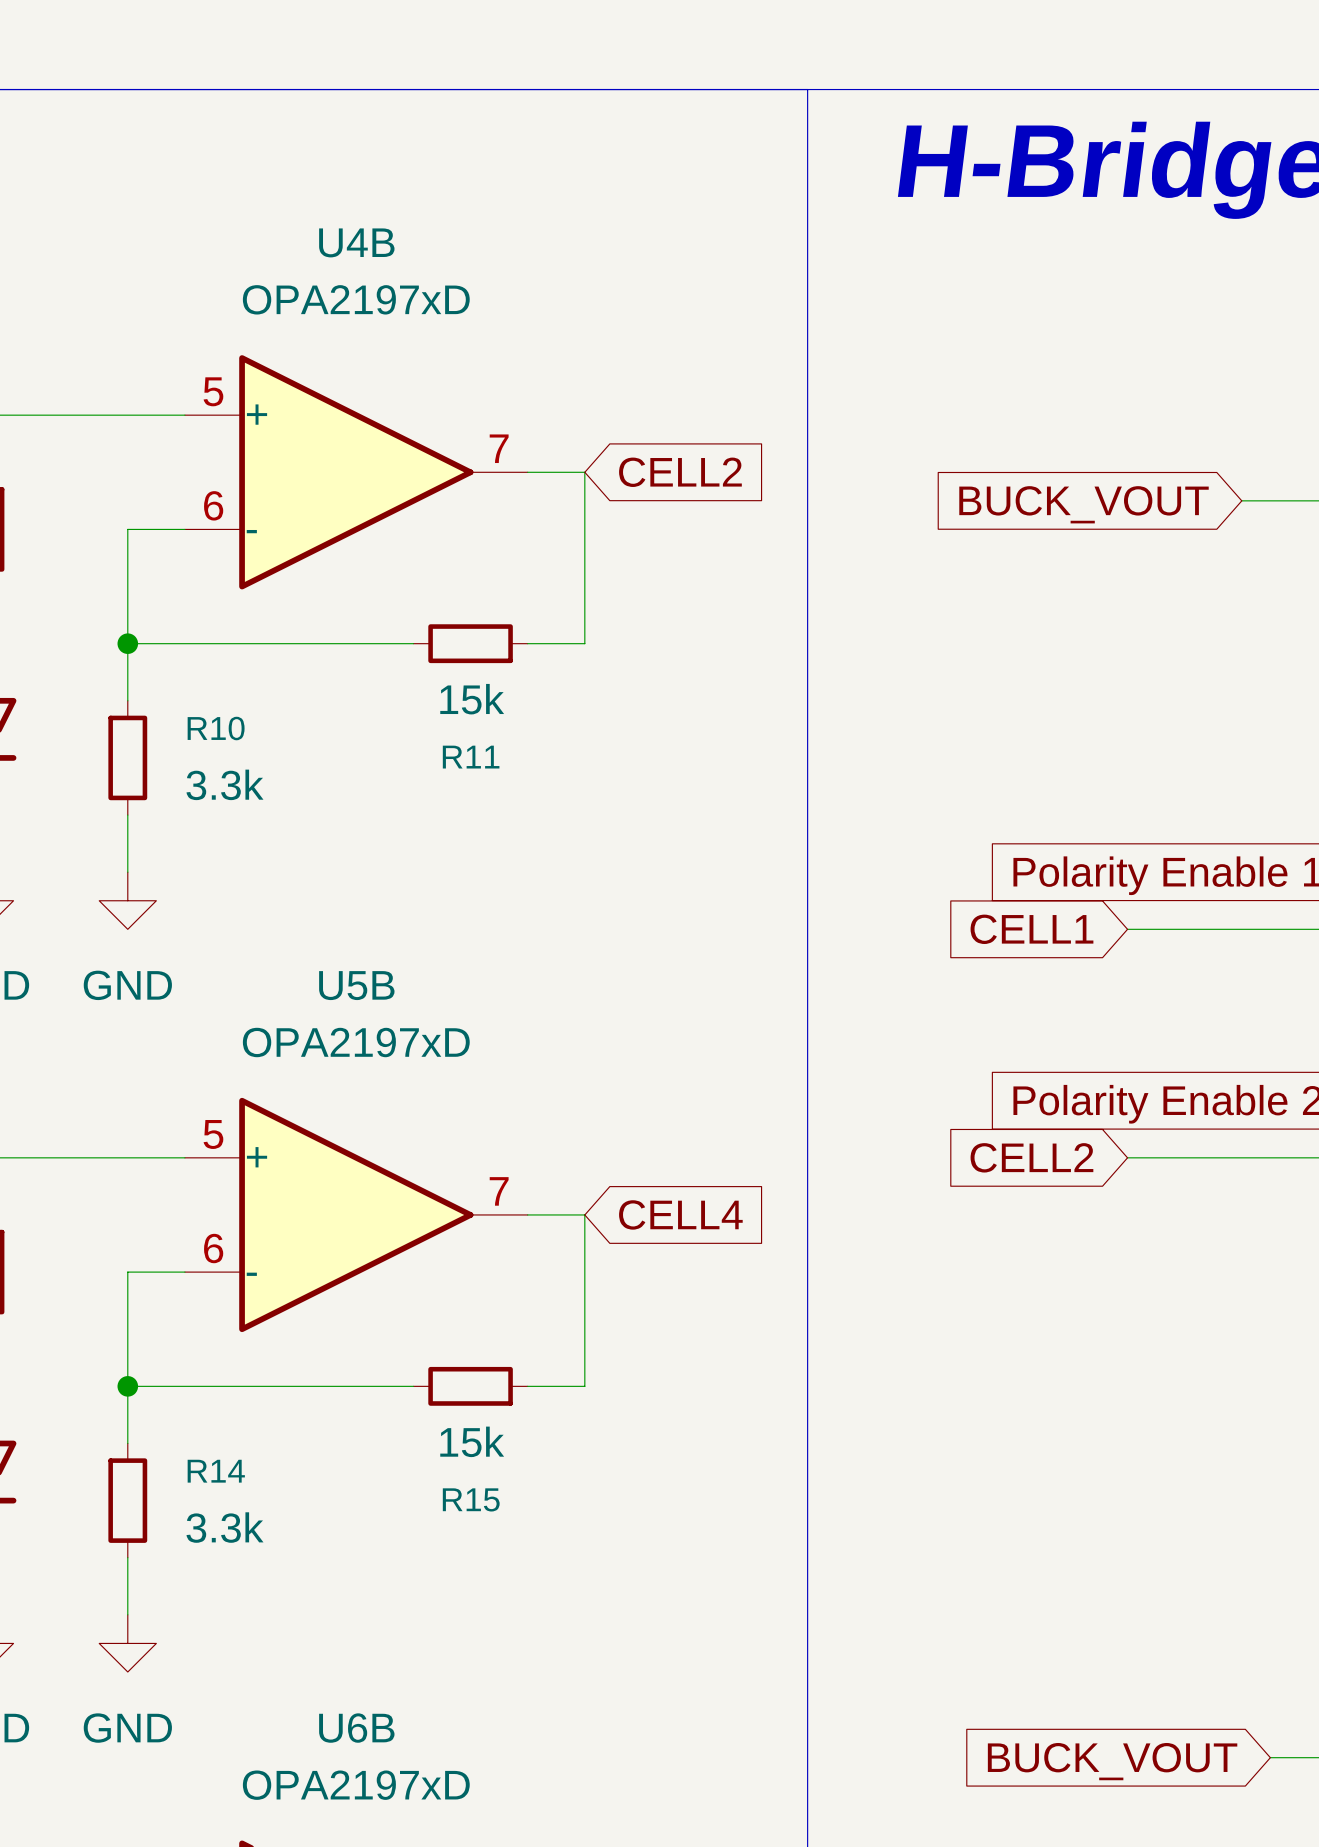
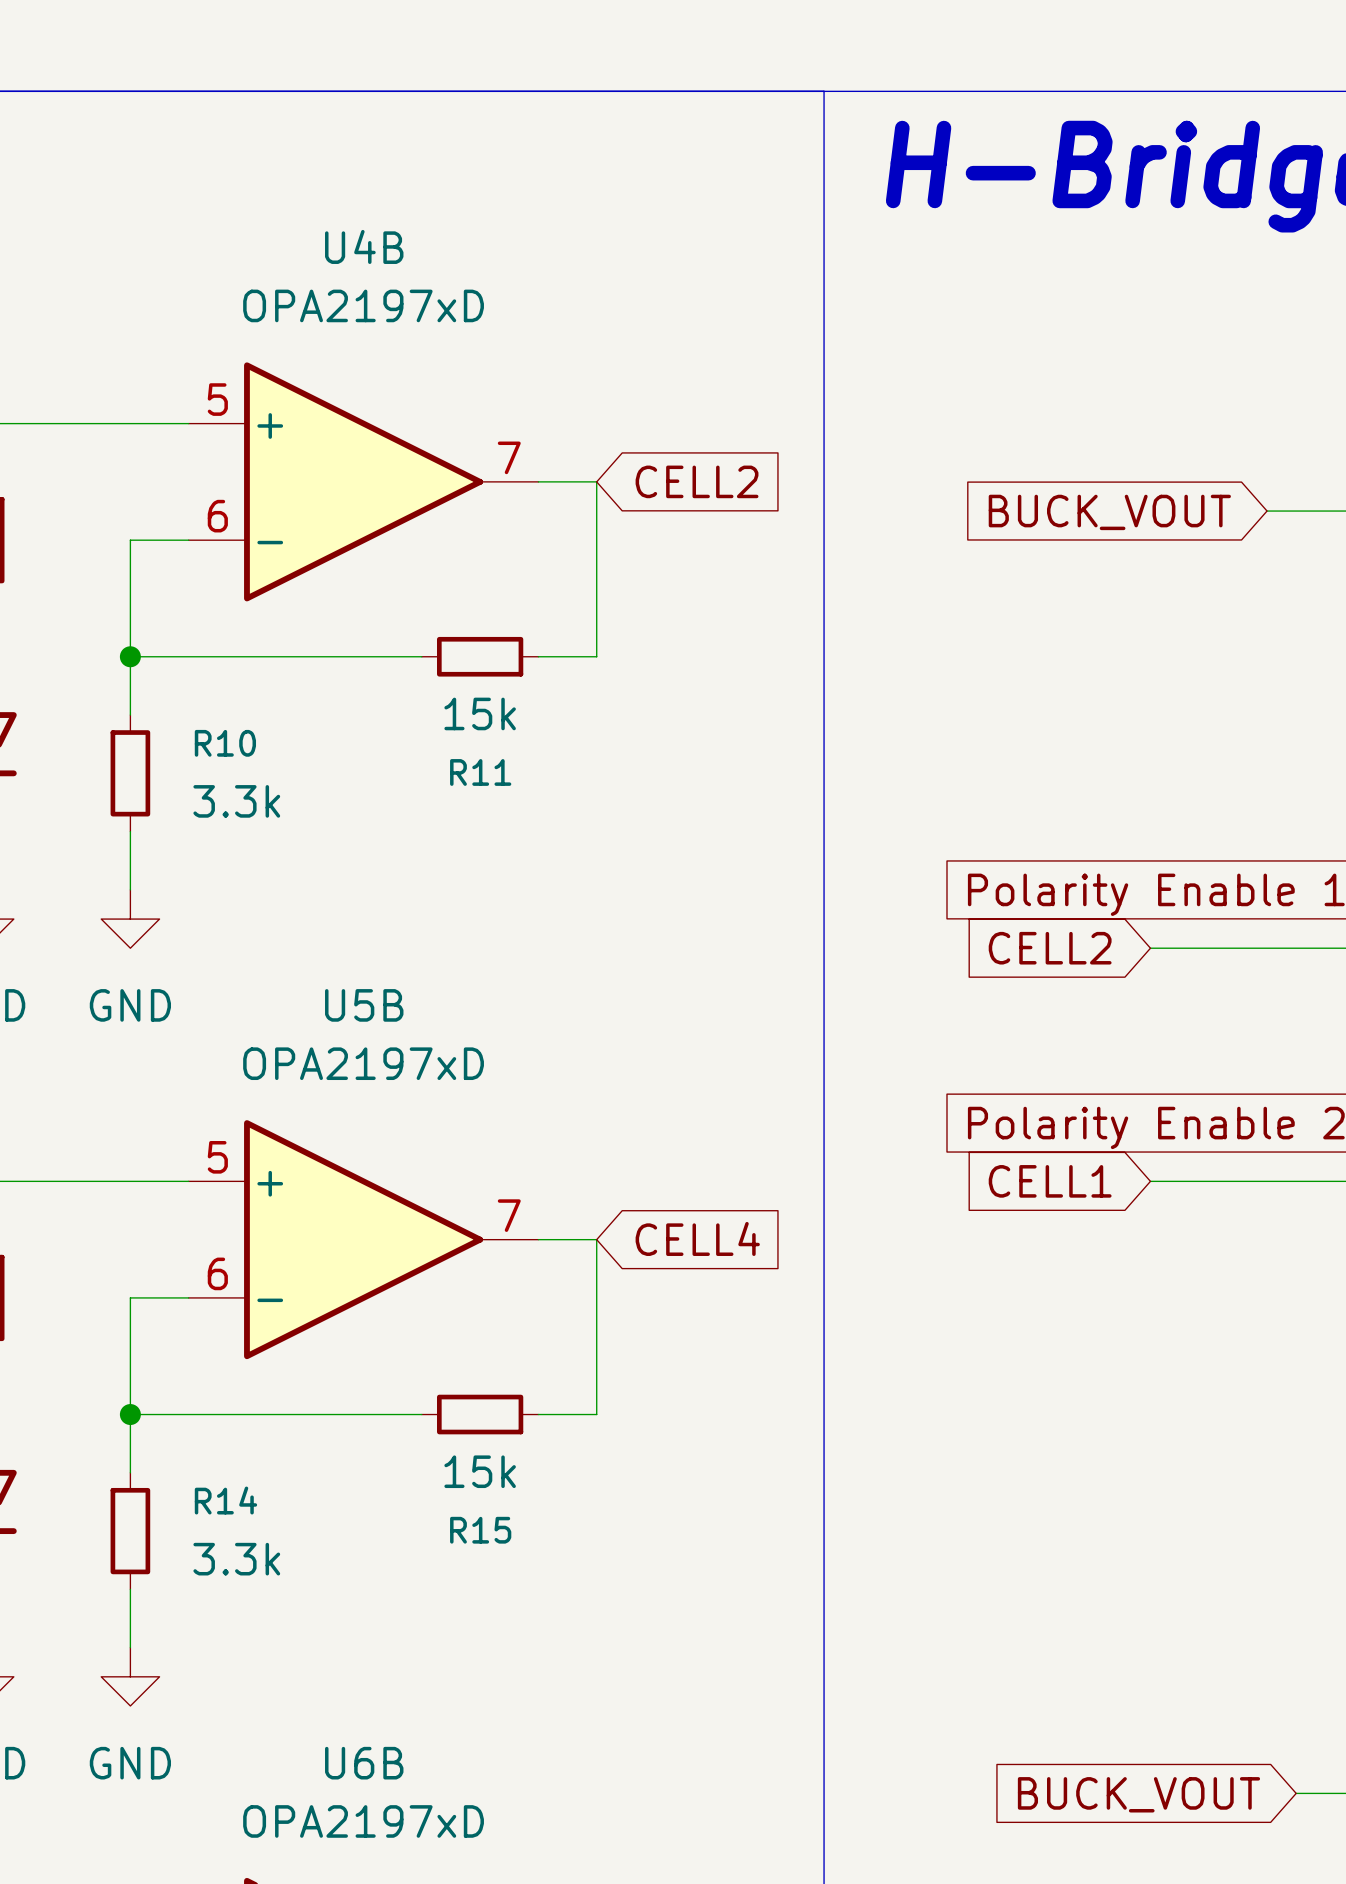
global label: CELL1 (1031, 929) -> CELL2 (1050, 948)
global label: CELL2 (1031, 1157) -> CELL1 (1050, 1181)

